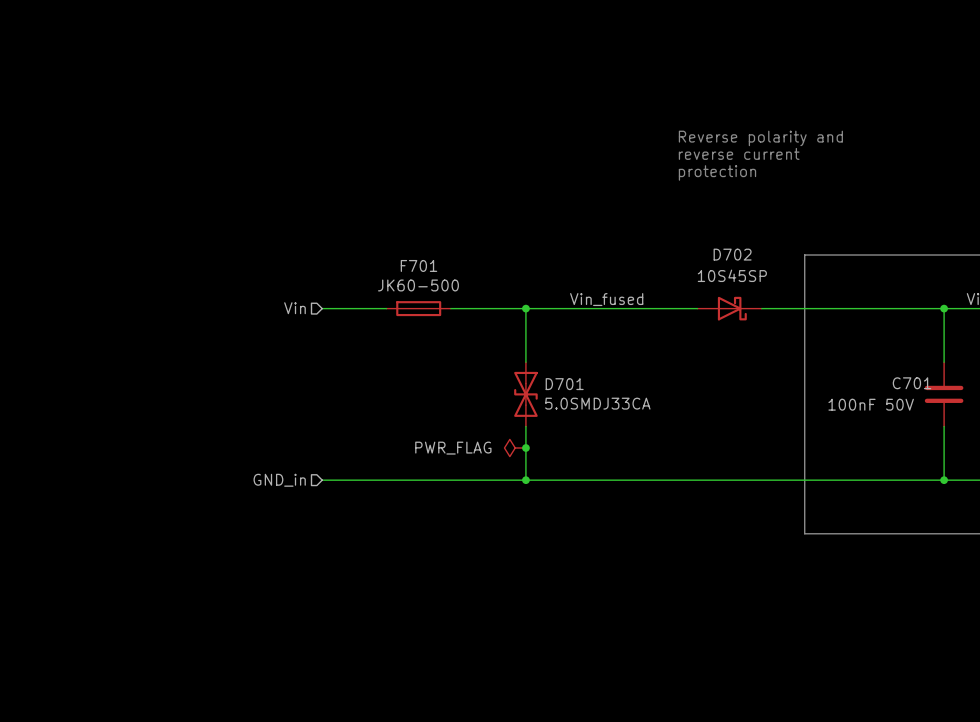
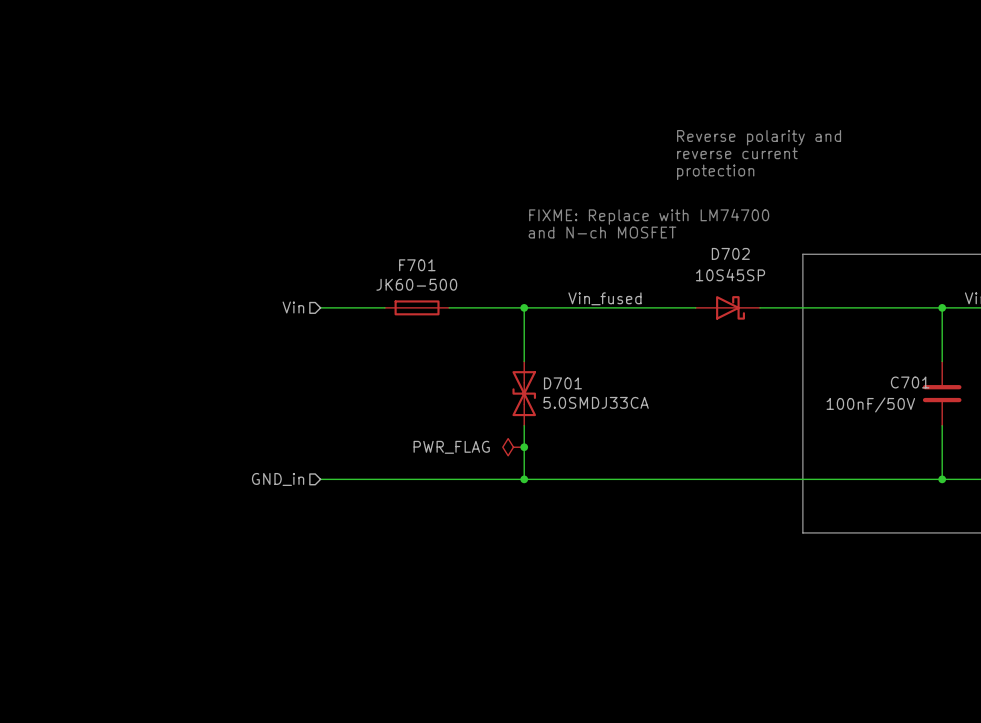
text: none -> FIXME: Replace with LM74700 (649, 216)
text: none -> and N-ch MOSFET (602, 232)
C701 value: 100nF 50V (871, 404) -> 100nF/50V (870, 404)

